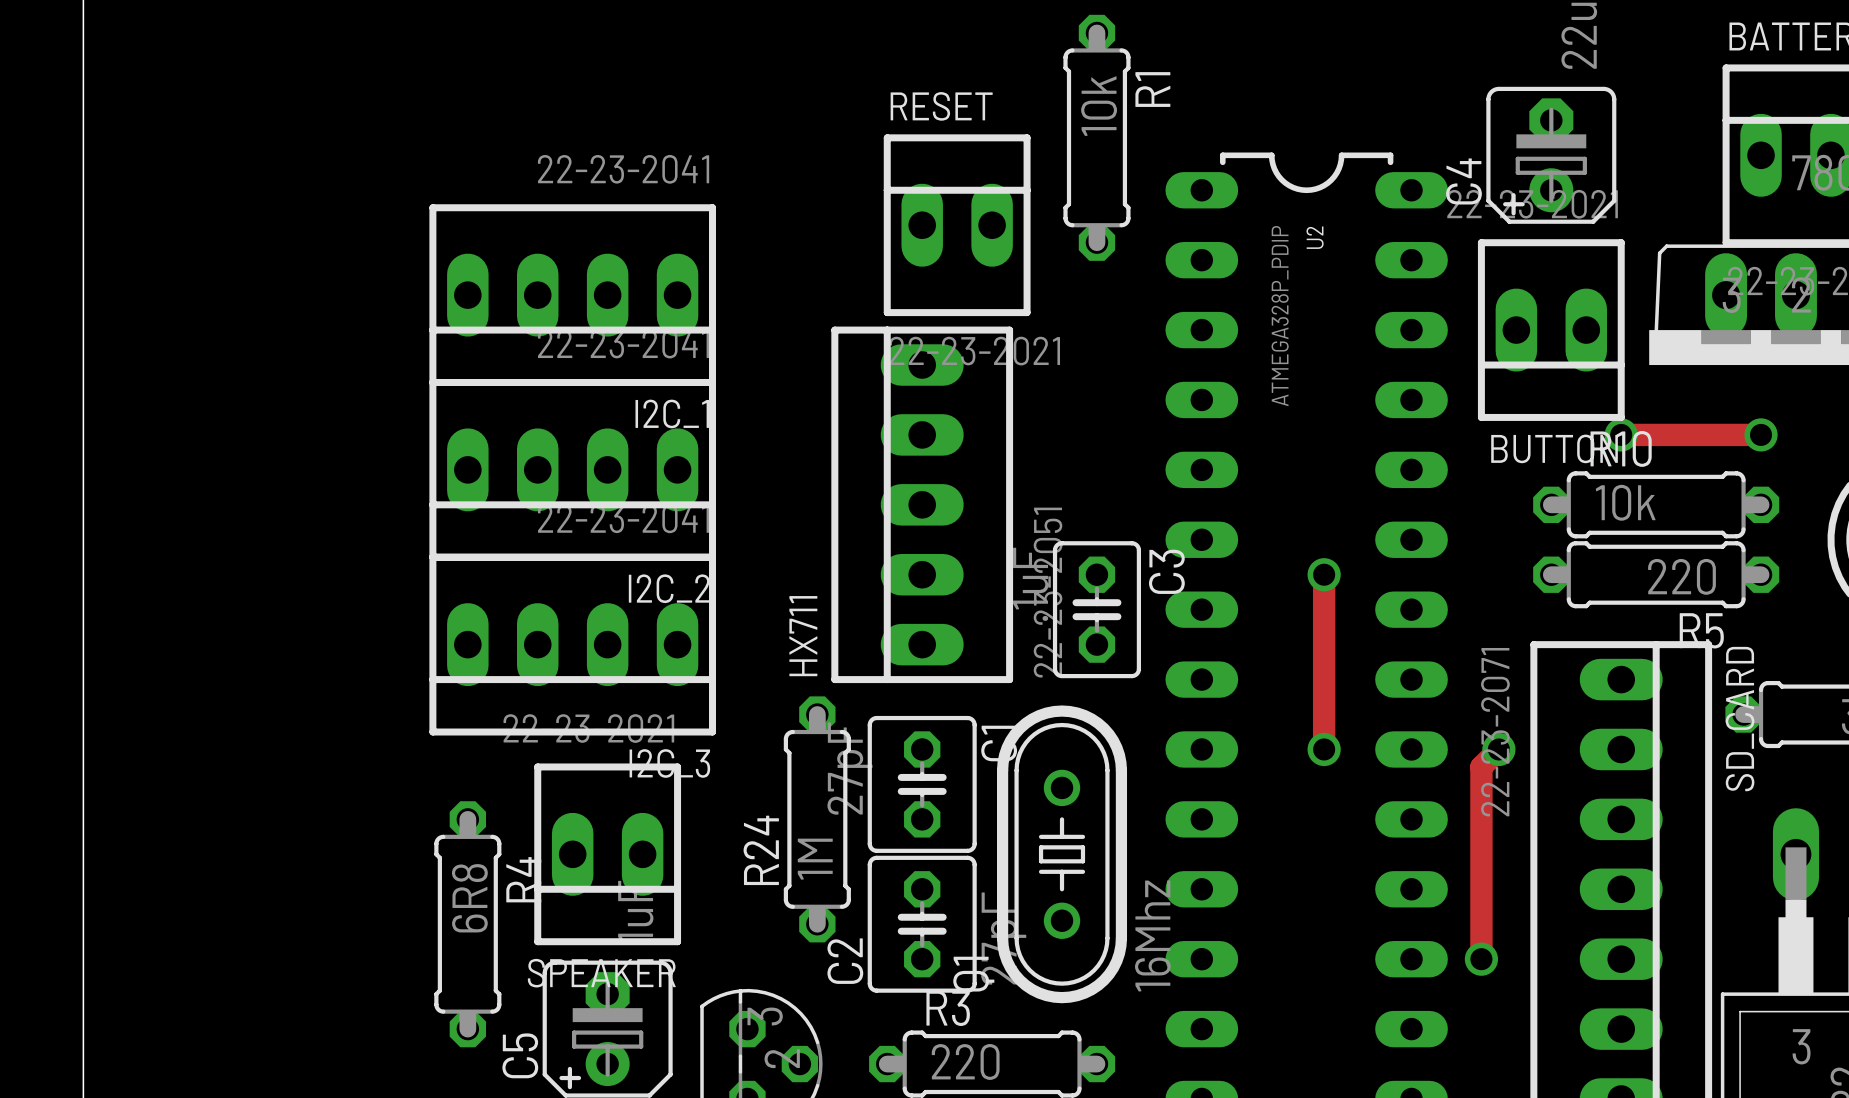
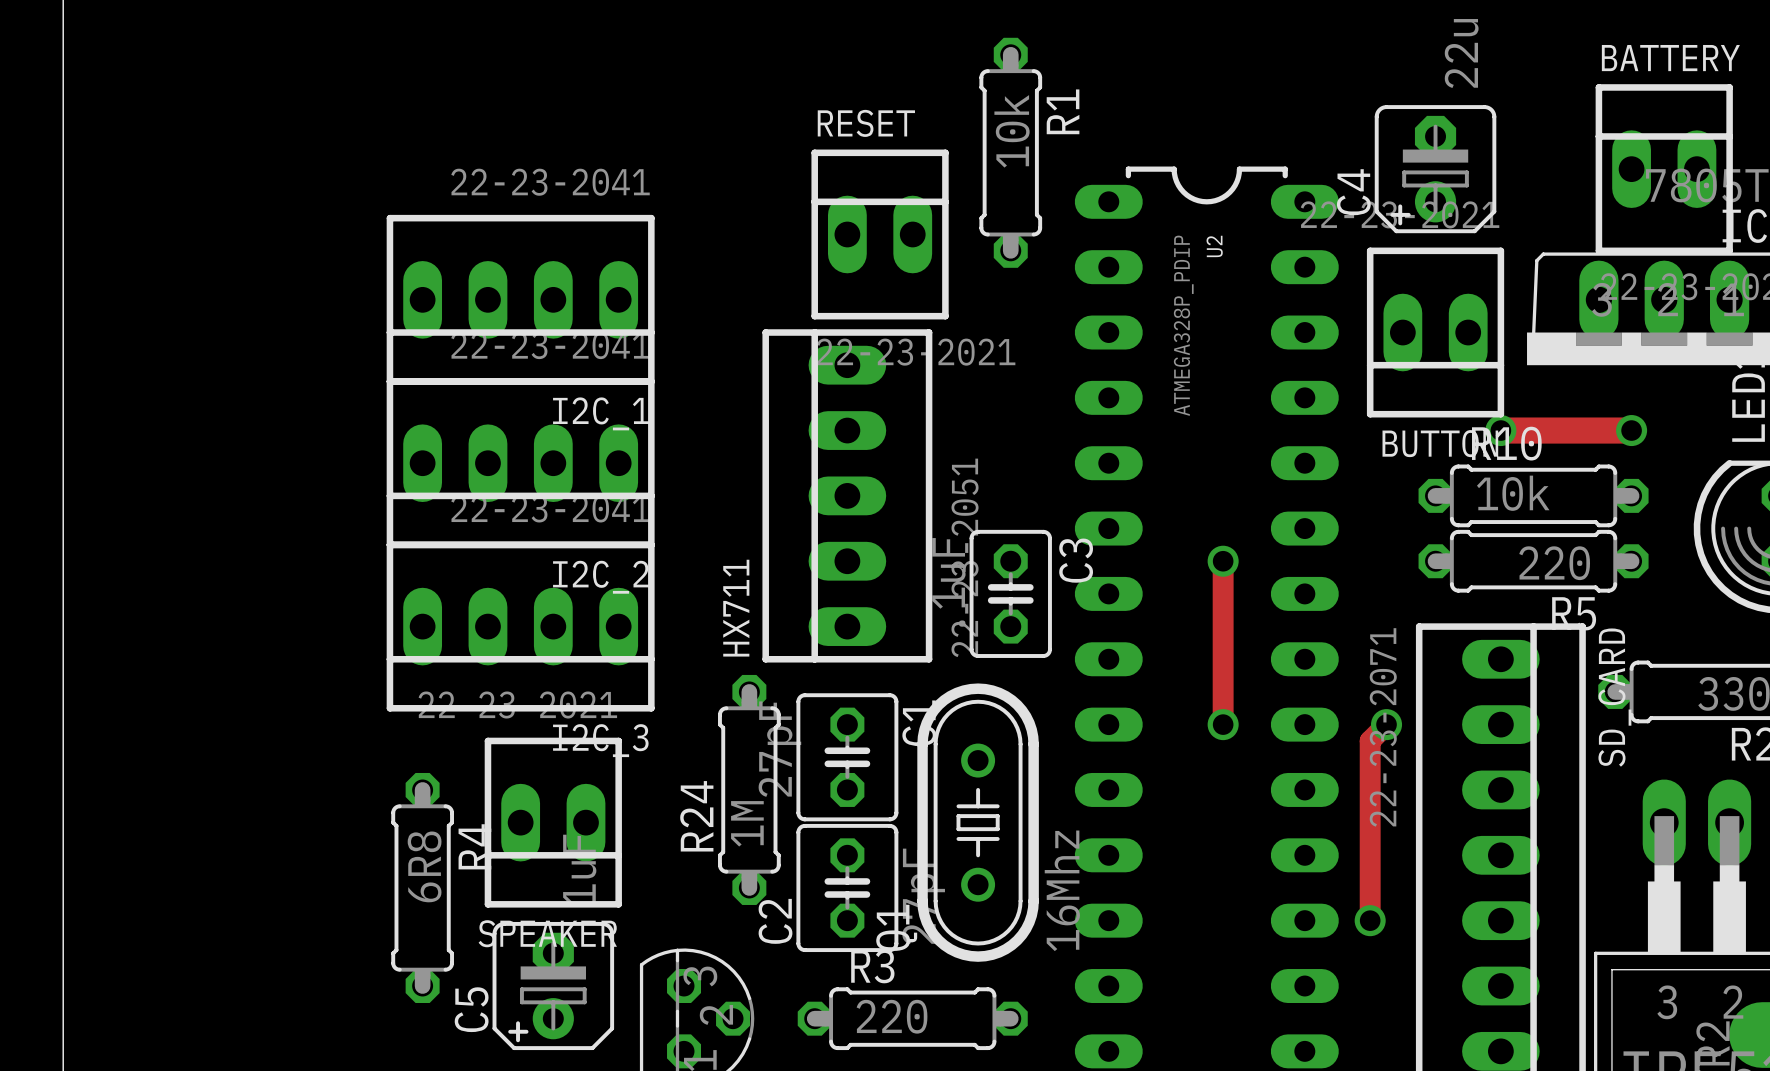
track width: thin (1621, 434) (1761, 434) -> thick (1500, 430) (1631, 430)

